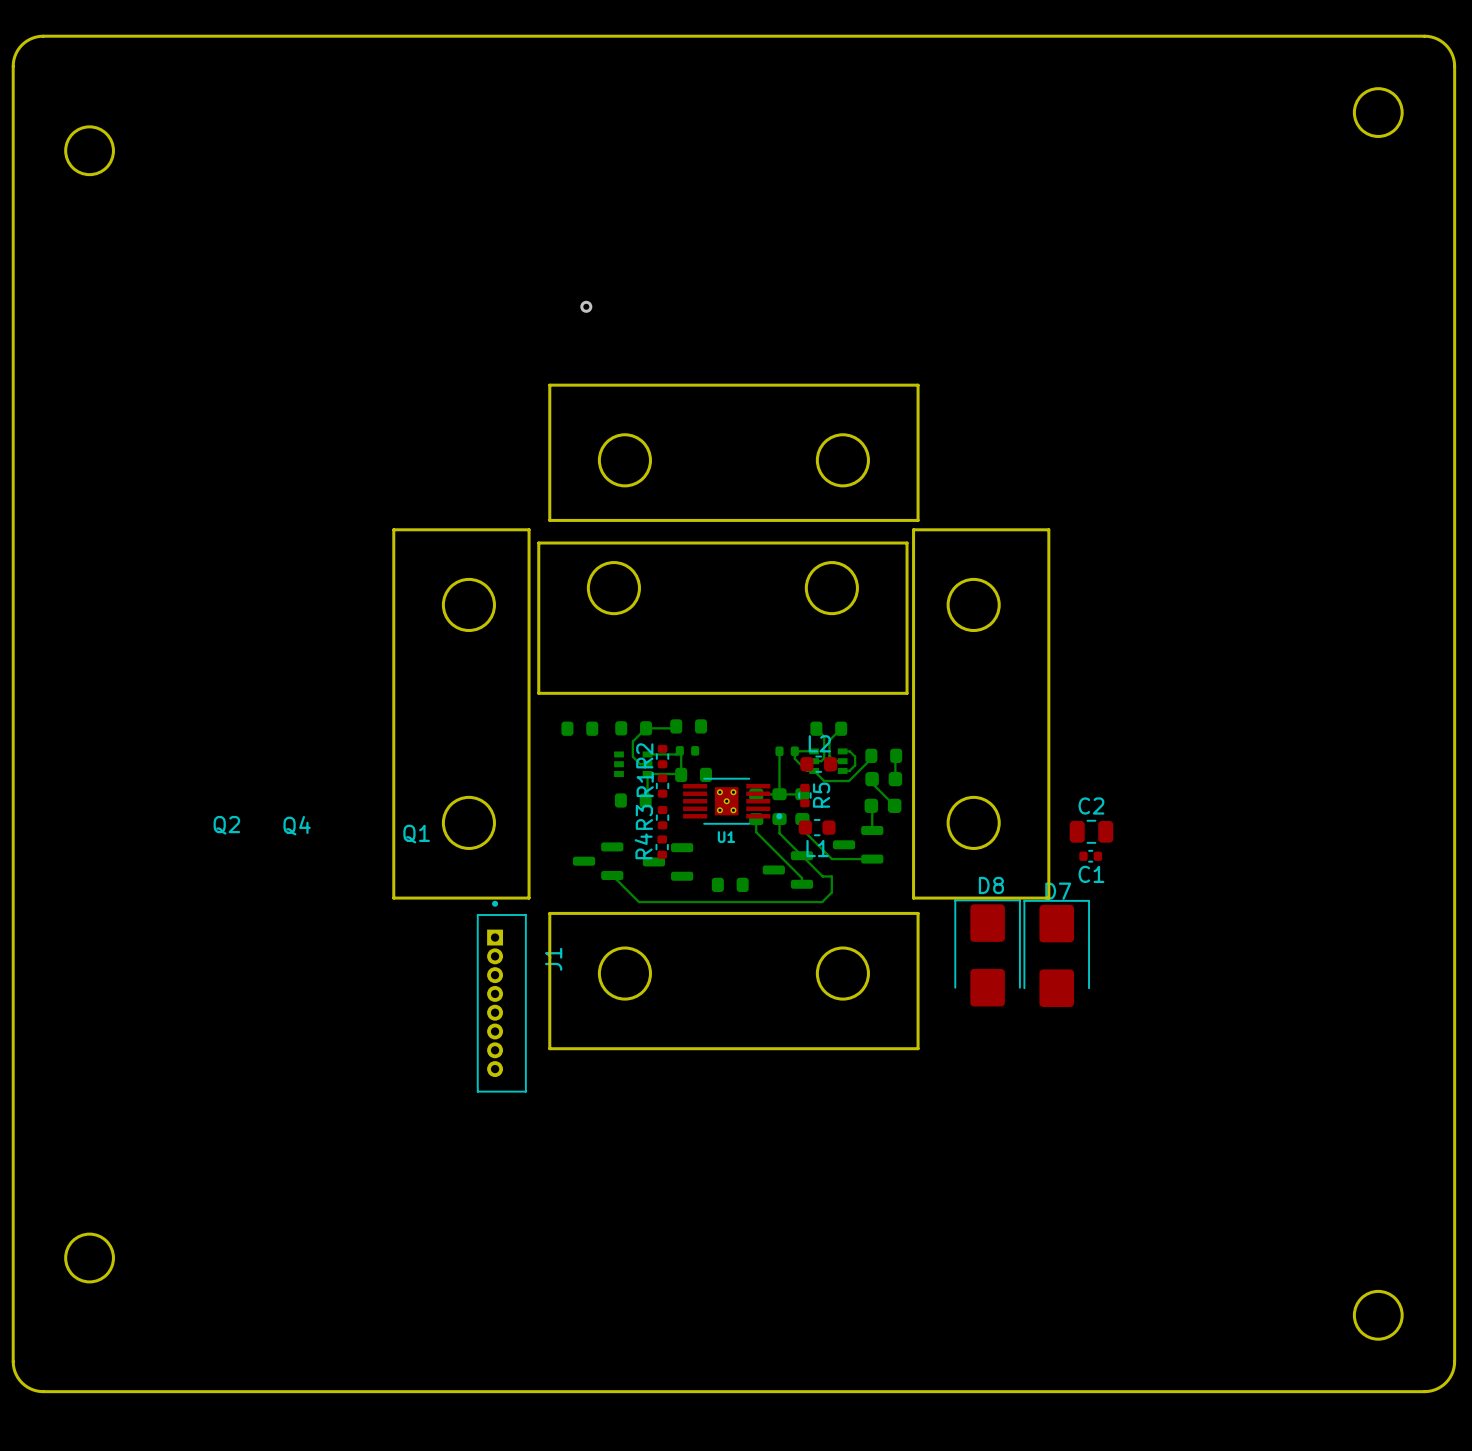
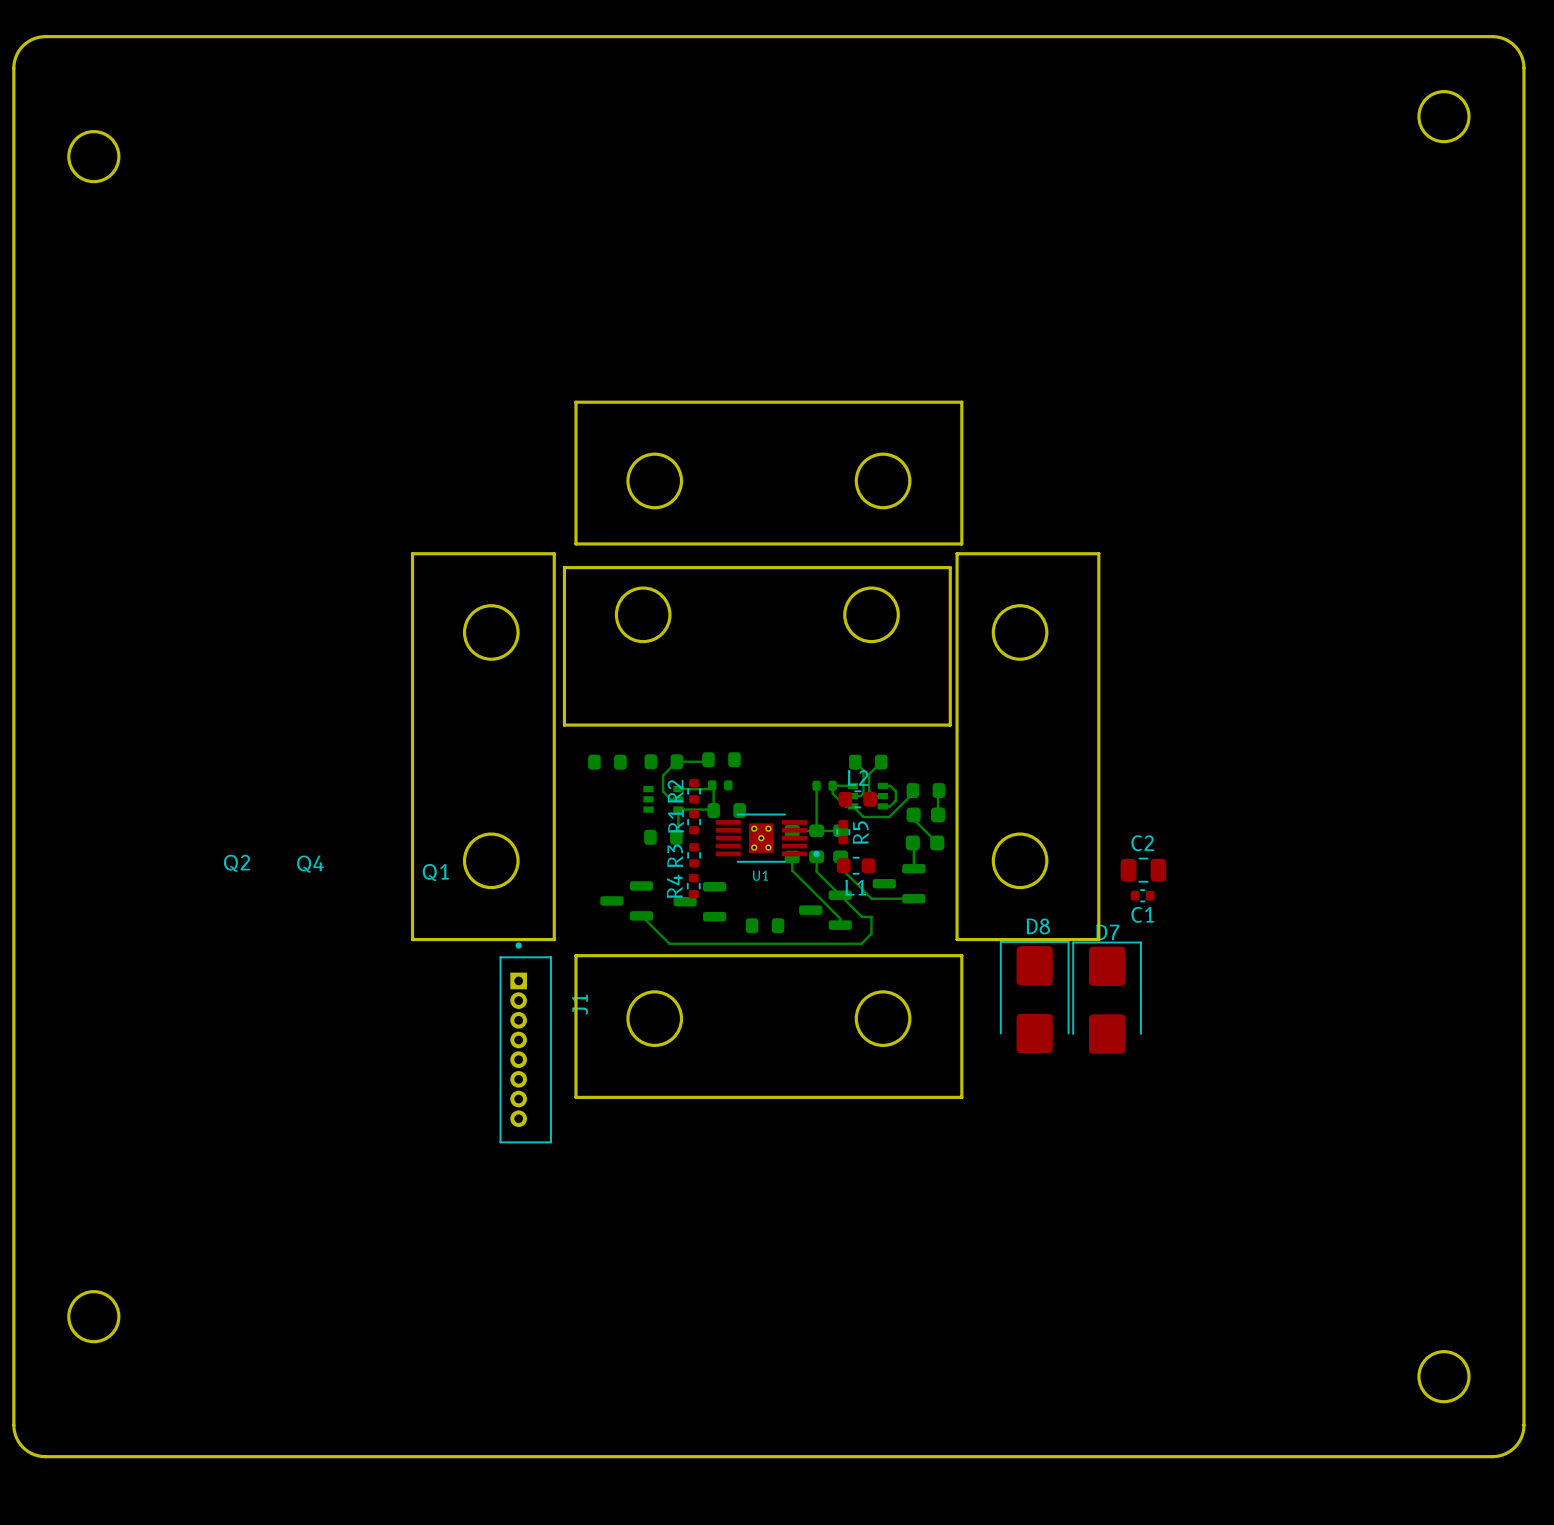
via: (586, 306) -> none

